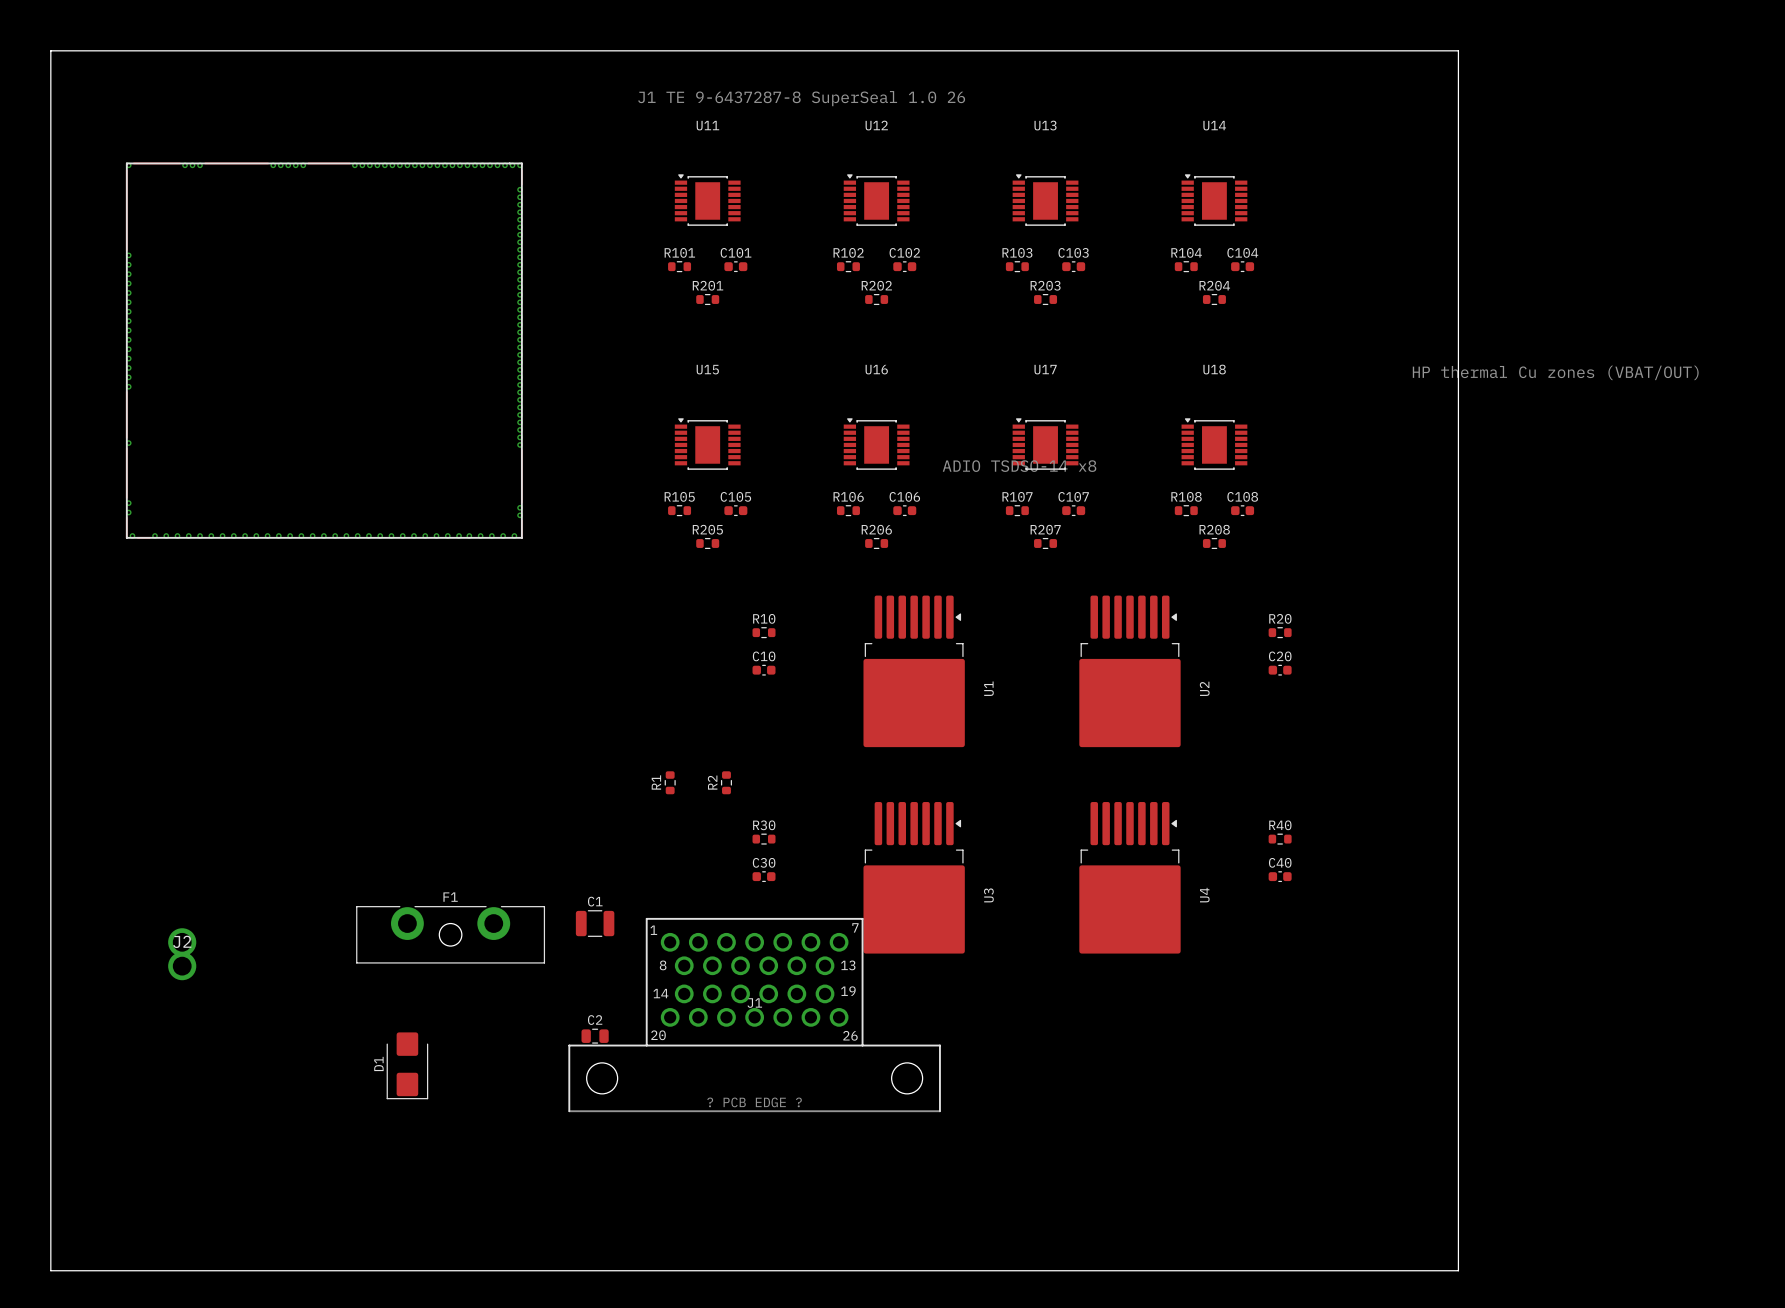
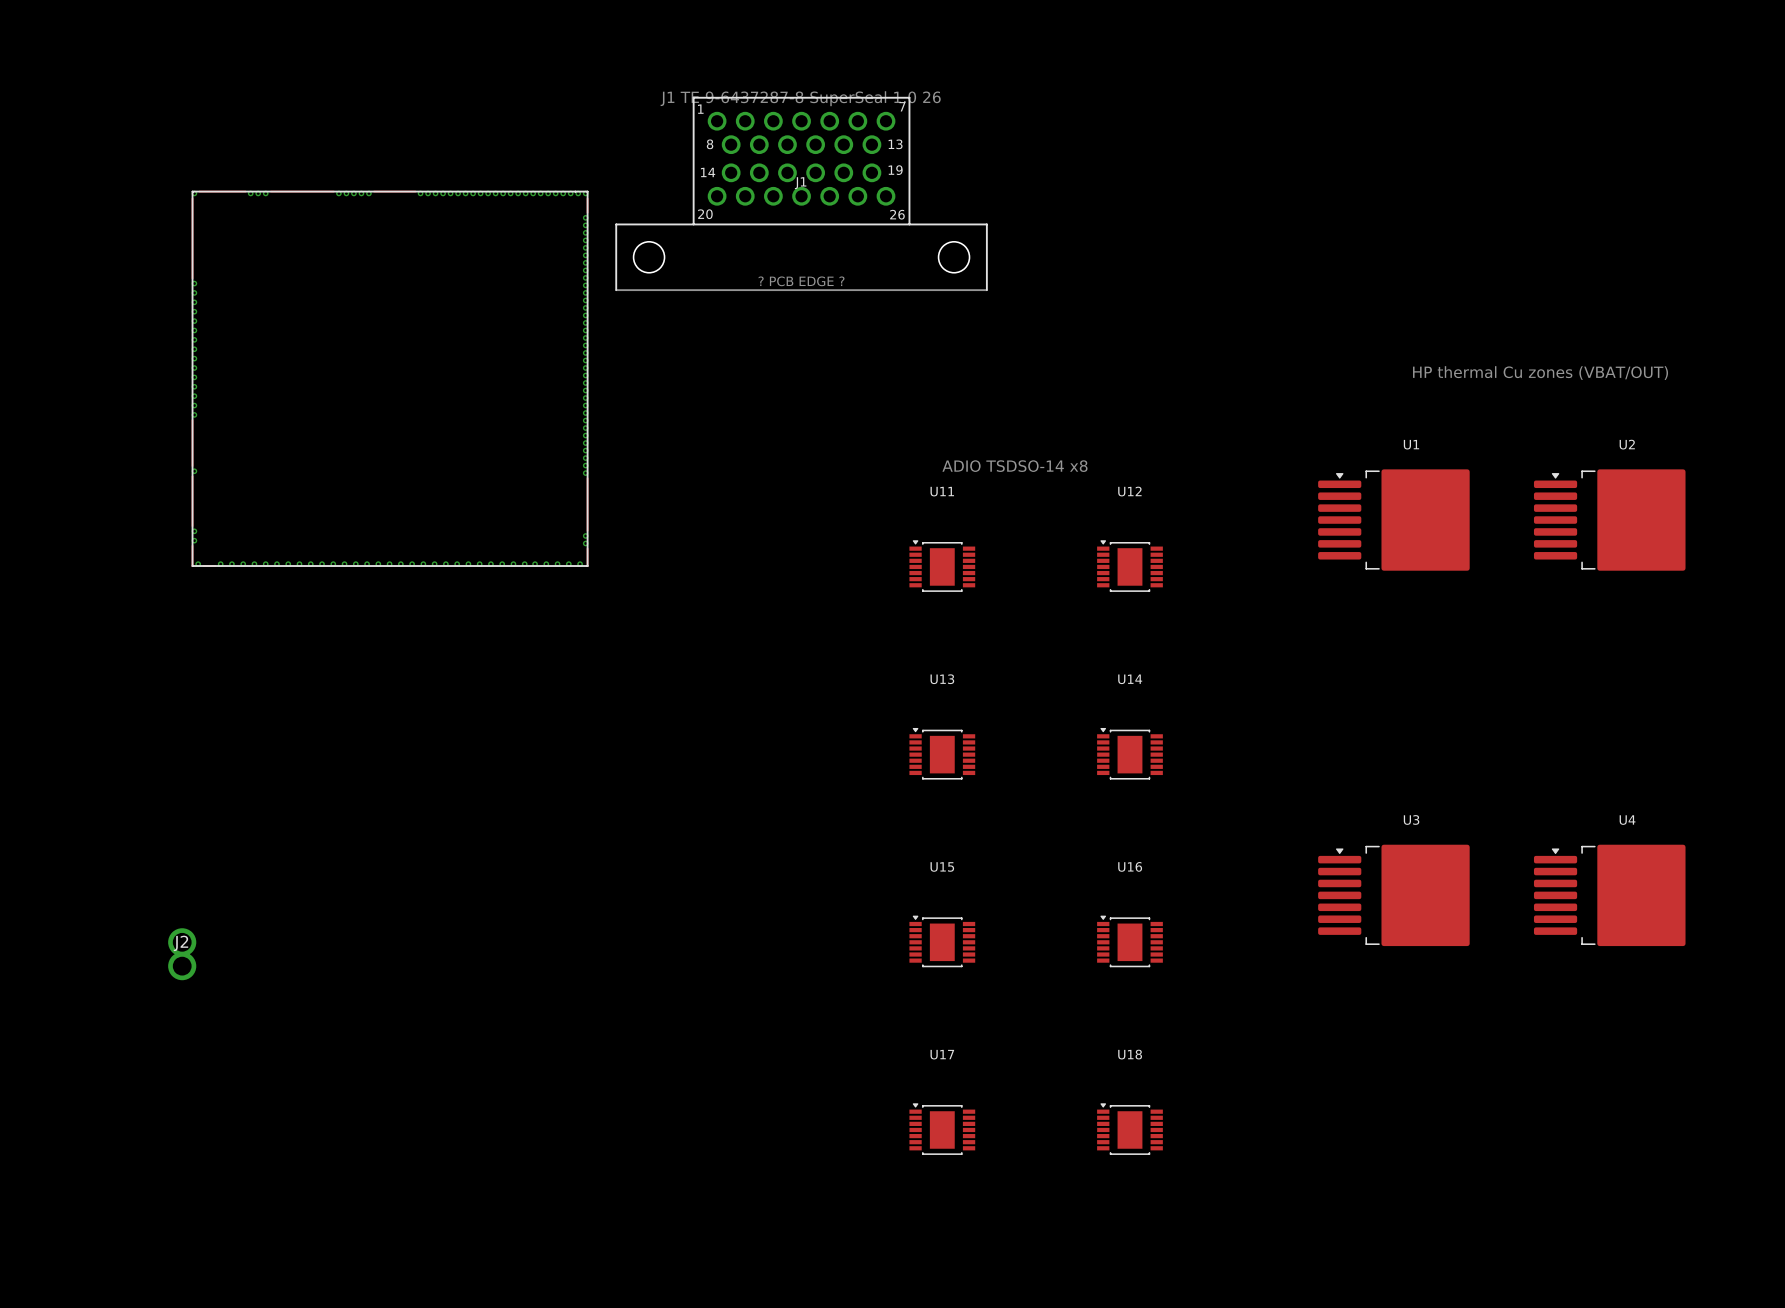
board edge: (50, 50) (1458, 50) (1458, 1270) (50, 1270) (50, 50) -> none
U11 position: (707, 200) -> (942, 566)
U12 position: (876, 200) -> (1129, 566)
U13 position: (1045, 200) -> (942, 753)
U14 position: (1214, 200) -> (1129, 753)
R101: (679, 266) -> none
C101: (735, 266) -> none
R102: (848, 266) -> none
C102: (904, 266) -> none
R103: (1017, 266) -> none
C103: (1073, 266) -> none
R104: (1186, 266) -> none
C104: (1242, 266) -> none
R201: (707, 299) -> none
R202: (876, 299) -> none
R203: (1045, 299) -> none
R204: (1214, 299) -> none
part position: (324, 350) -> (390, 378)
U15 position: (707, 444) -> (942, 941)
U16 position: (876, 444) -> (1129, 941)
U17 position: (1045, 444) -> (942, 1129)
U18 position: (1214, 444) -> (1129, 1129)
R105: (679, 510) -> none
C105: (735, 510) -> none
R106: (848, 510) -> none
C106: (904, 510) -> none
R107: (1017, 510) -> none
C107: (1073, 510) -> none
R108: (1186, 510) -> none
C108: (1242, 510) -> none
R205: (707, 543) -> none
R206: (876, 543) -> none
R207: (1045, 543) -> none
R208: (1214, 543) -> none
R10: (764, 632) -> none
R20: (1280, 632) -> none
C10: (764, 670) -> none
C20: (1280, 670) -> none
U1 rotation: 0° (914, 671) -> 90° counterclockwise (1393, 520)
U1 position: (914, 671) -> (1393, 520)
U2 rotation: 0° (1129, 671) -> 90° counterclockwise (1609, 520)
U2 position: (1129, 671) -> (1609, 520)
R1: (670, 782) -> none
R2: (726, 782) -> none
R30: (764, 839) -> none
R40: (1280, 839) -> none
C30: (764, 876) -> none
C40: (1280, 876) -> none
U3 rotation: 0° (914, 877) -> 90° counterclockwise (1393, 895)
U3 position: (914, 877) -> (1393, 895)
U4 rotation: 0° (1129, 877) -> 90° counterclockwise (1609, 895)
U4 position: (1129, 877) -> (1609, 895)
C1: (595, 923) -> none
F1: (450, 934) -> none
J1 position: (754, 1015) -> (801, 193)
C2: (595, 1036) -> none
D1: (407, 1065) -> none

